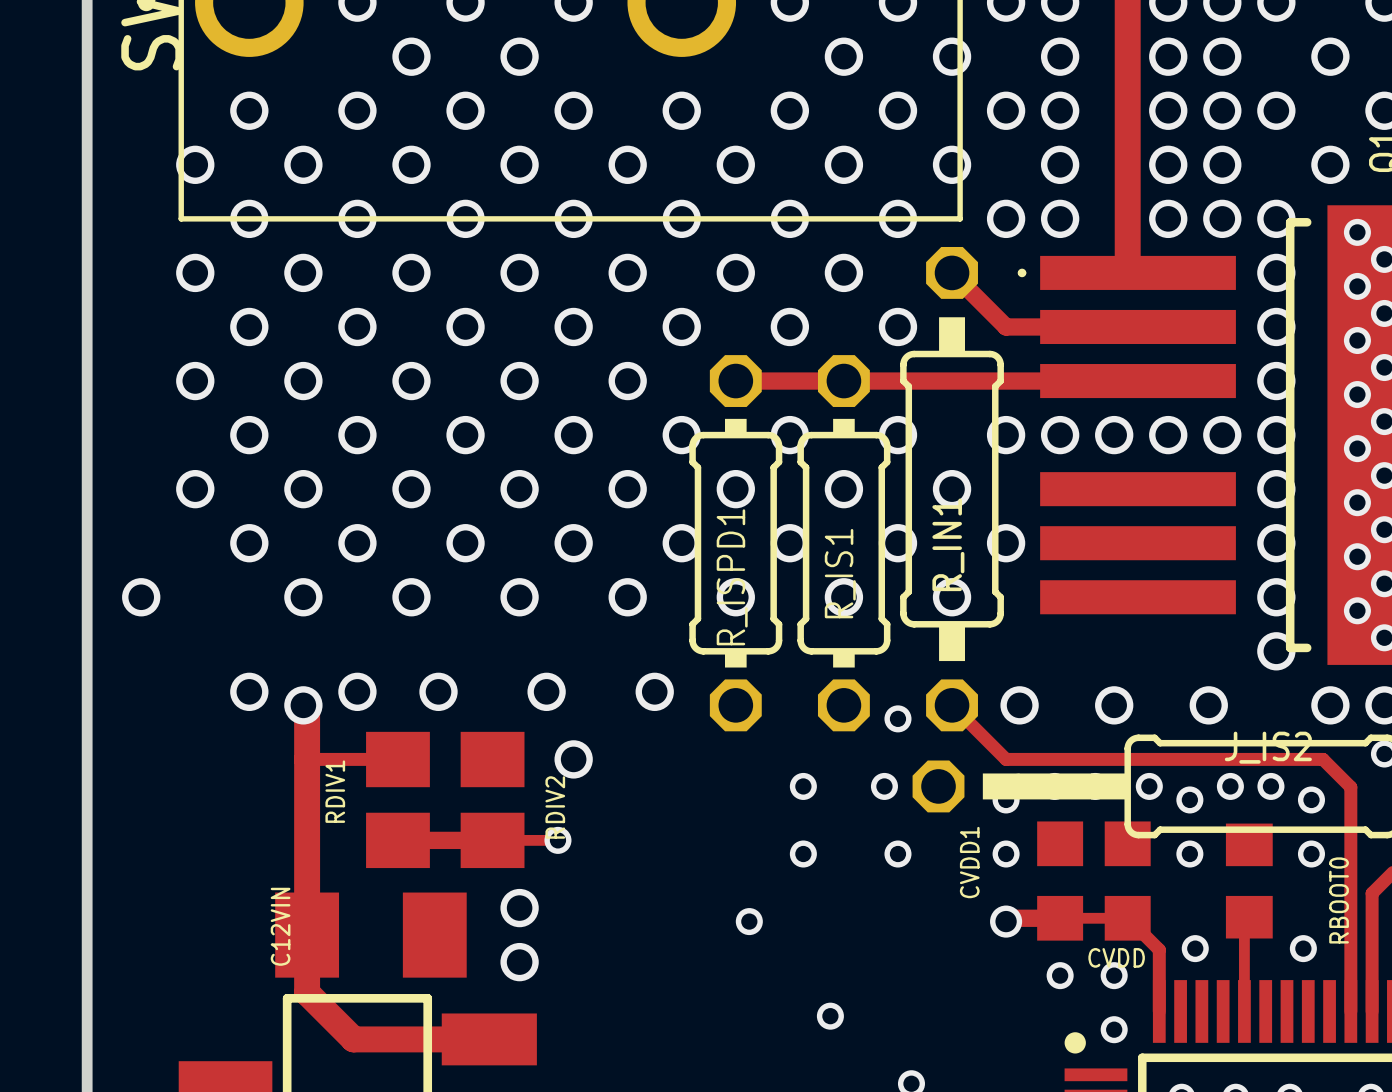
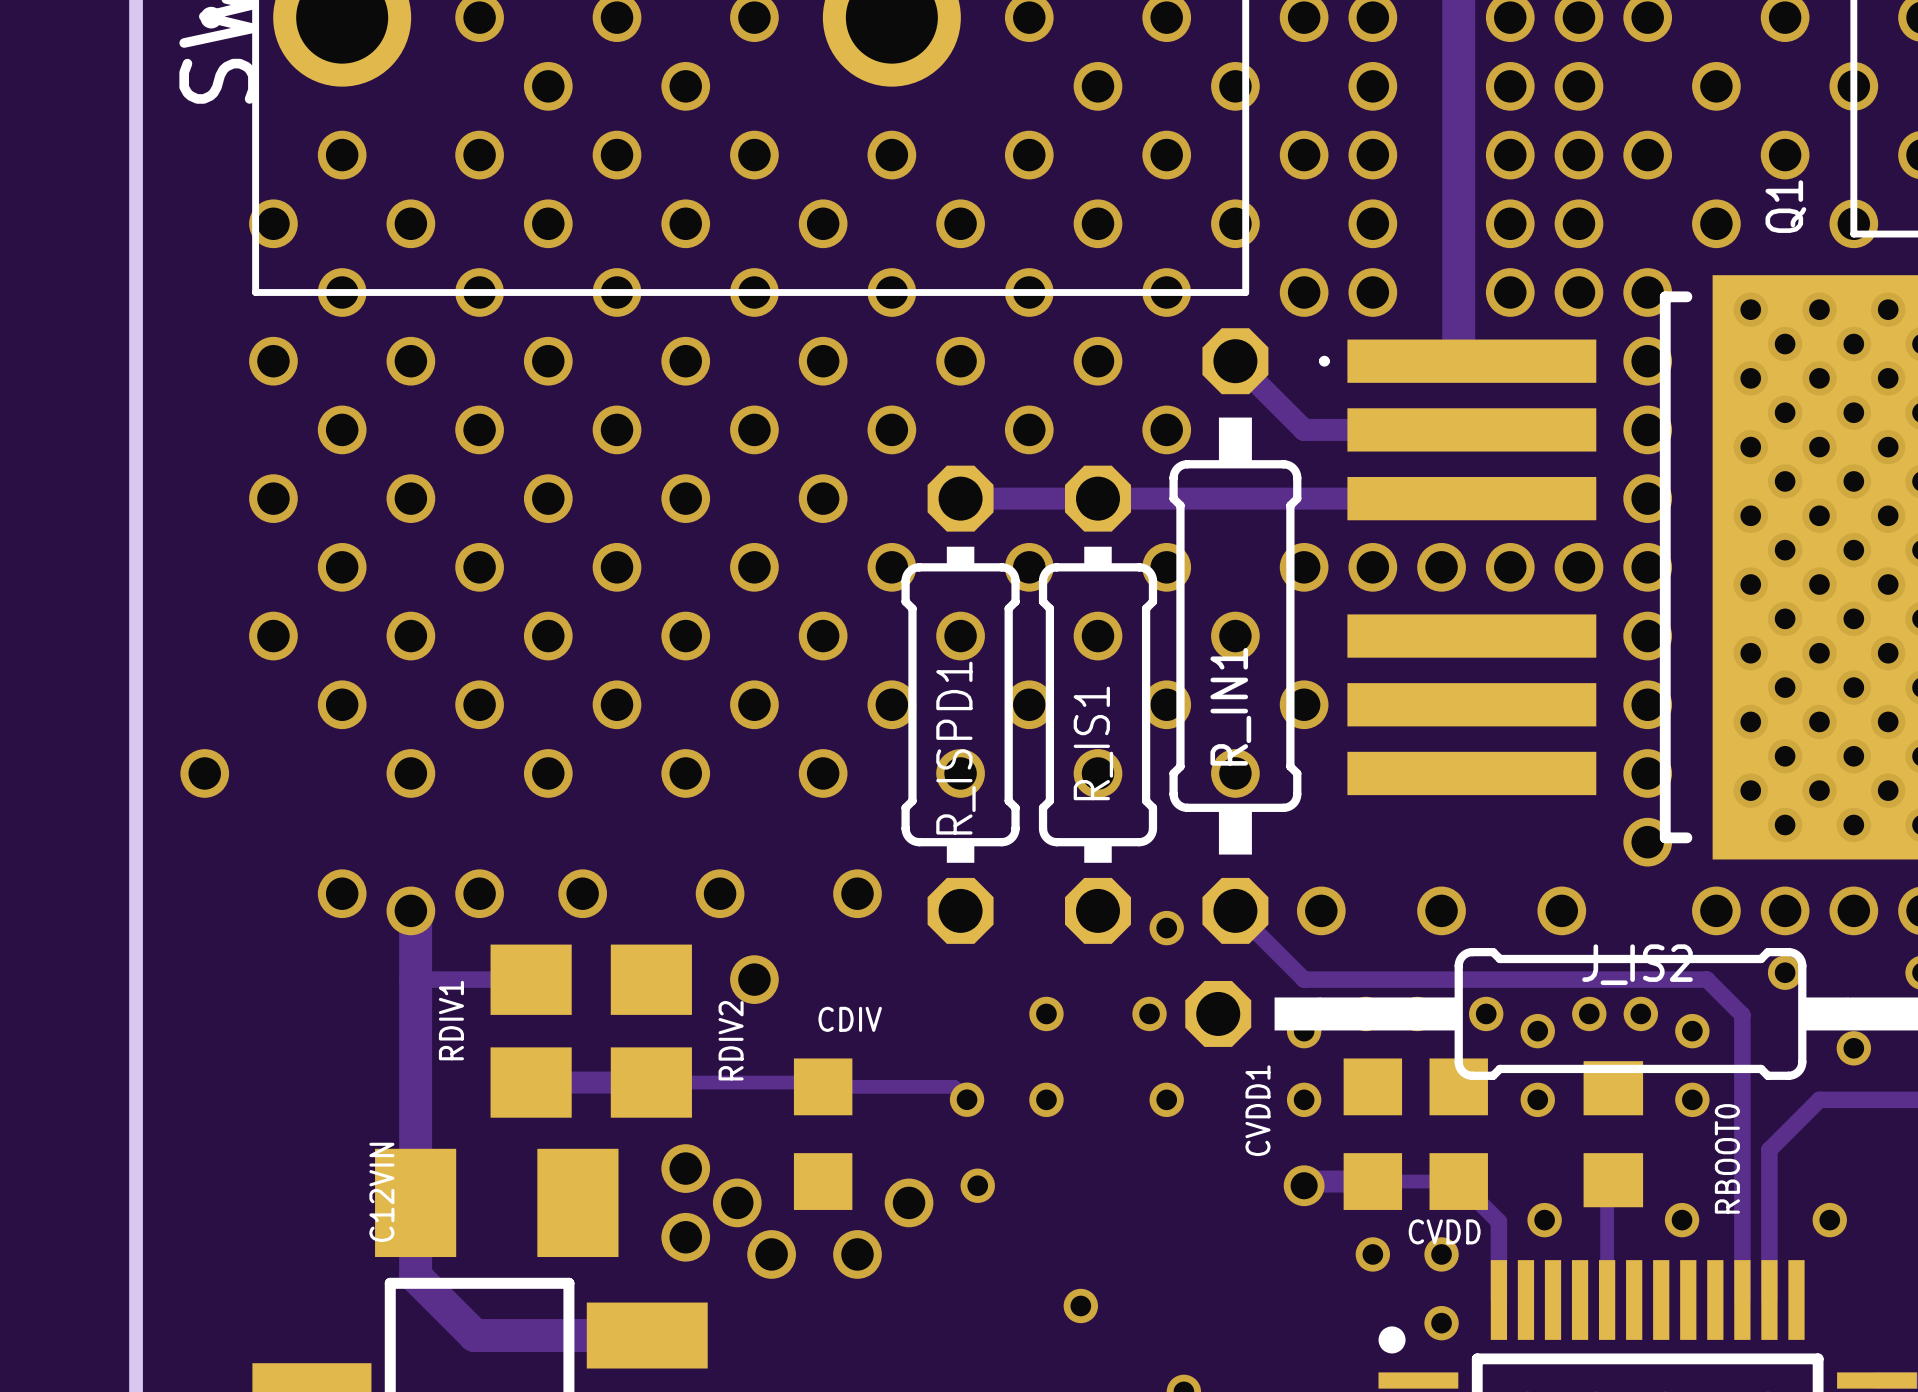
track: none -> (734, 1082) (823, 1082) (823, 1086) (954, 1086) (967, 1099)
via position: (557, 840) -> (967, 1099)
CDIV: none -> (823, 1134)
via: none -> (737, 1202)
via: none -> (909, 1202)
via: none -> (771, 1254)
via: none -> (857, 1254)

